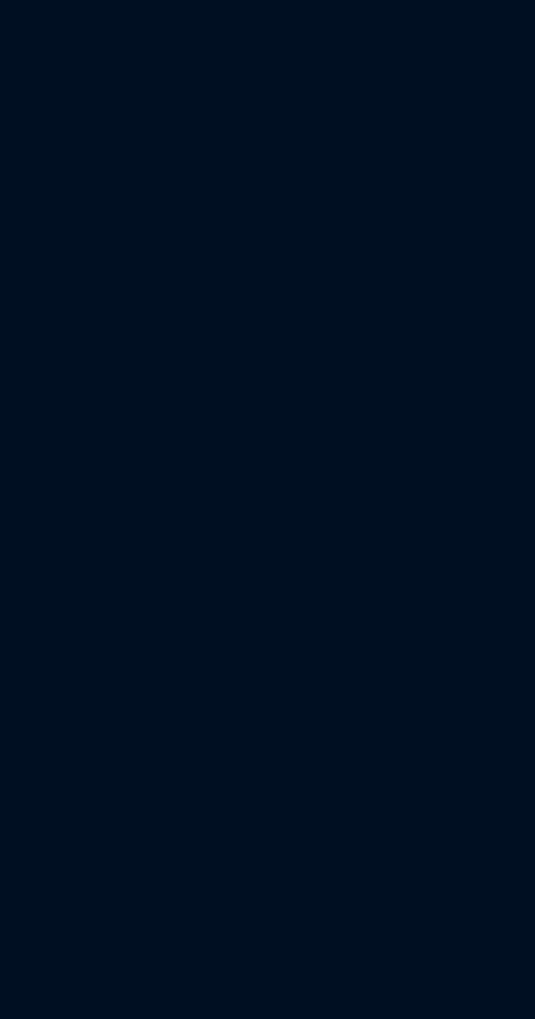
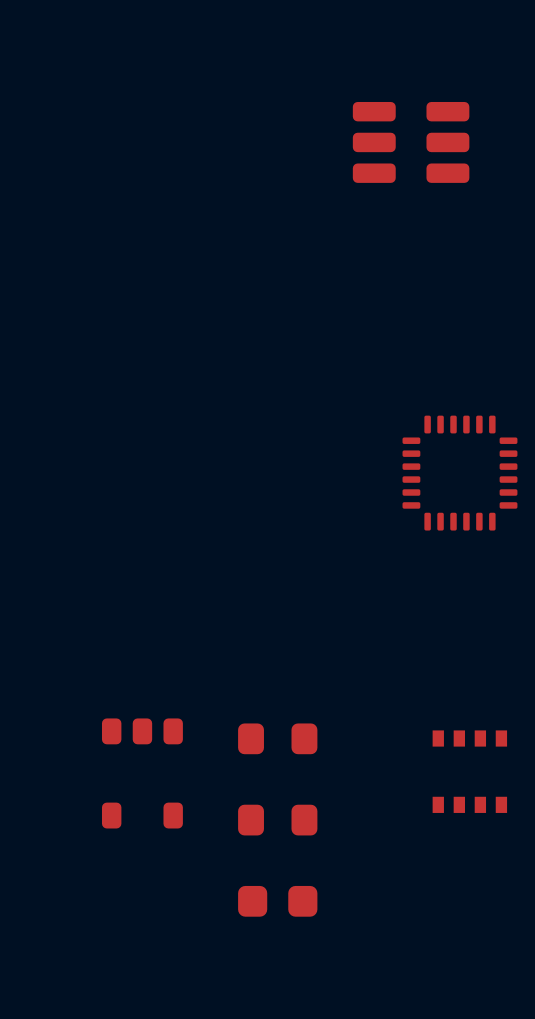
part: none -> (411, 142)
part: none -> (459, 473)
part: none -> (277, 738)
part: none -> (469, 771)
part: none -> (142, 773)
part: none -> (277, 820)
part: none -> (277, 901)

